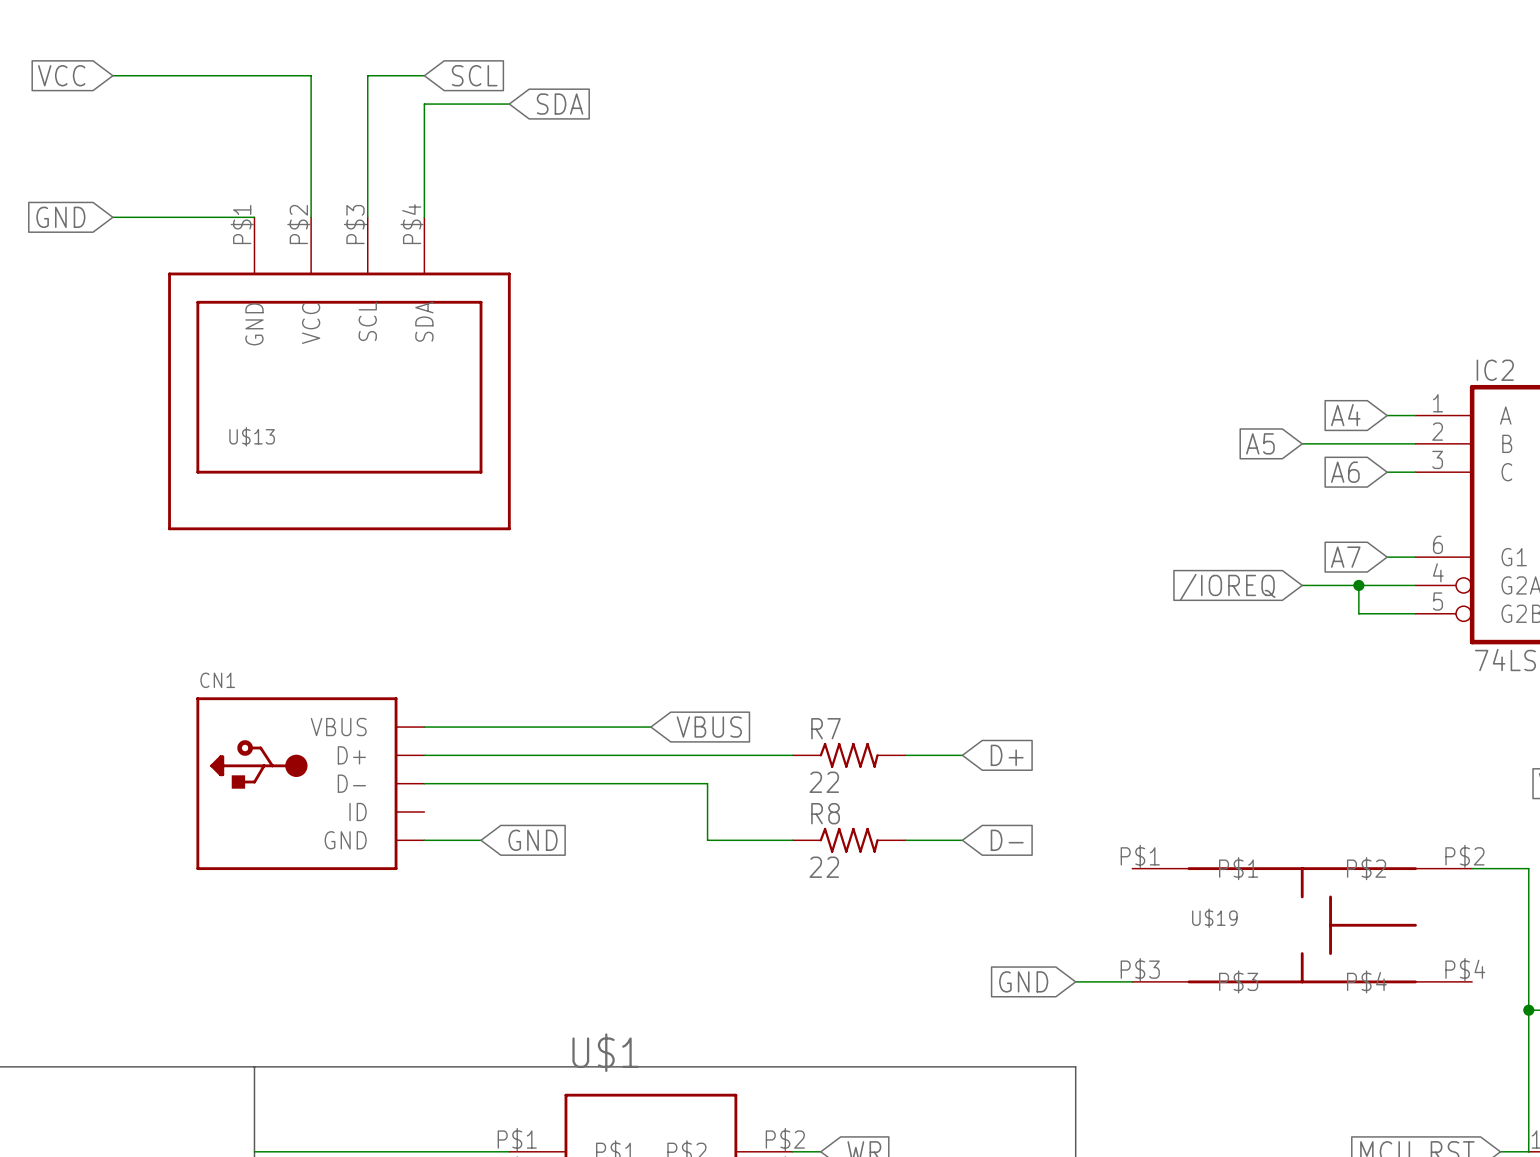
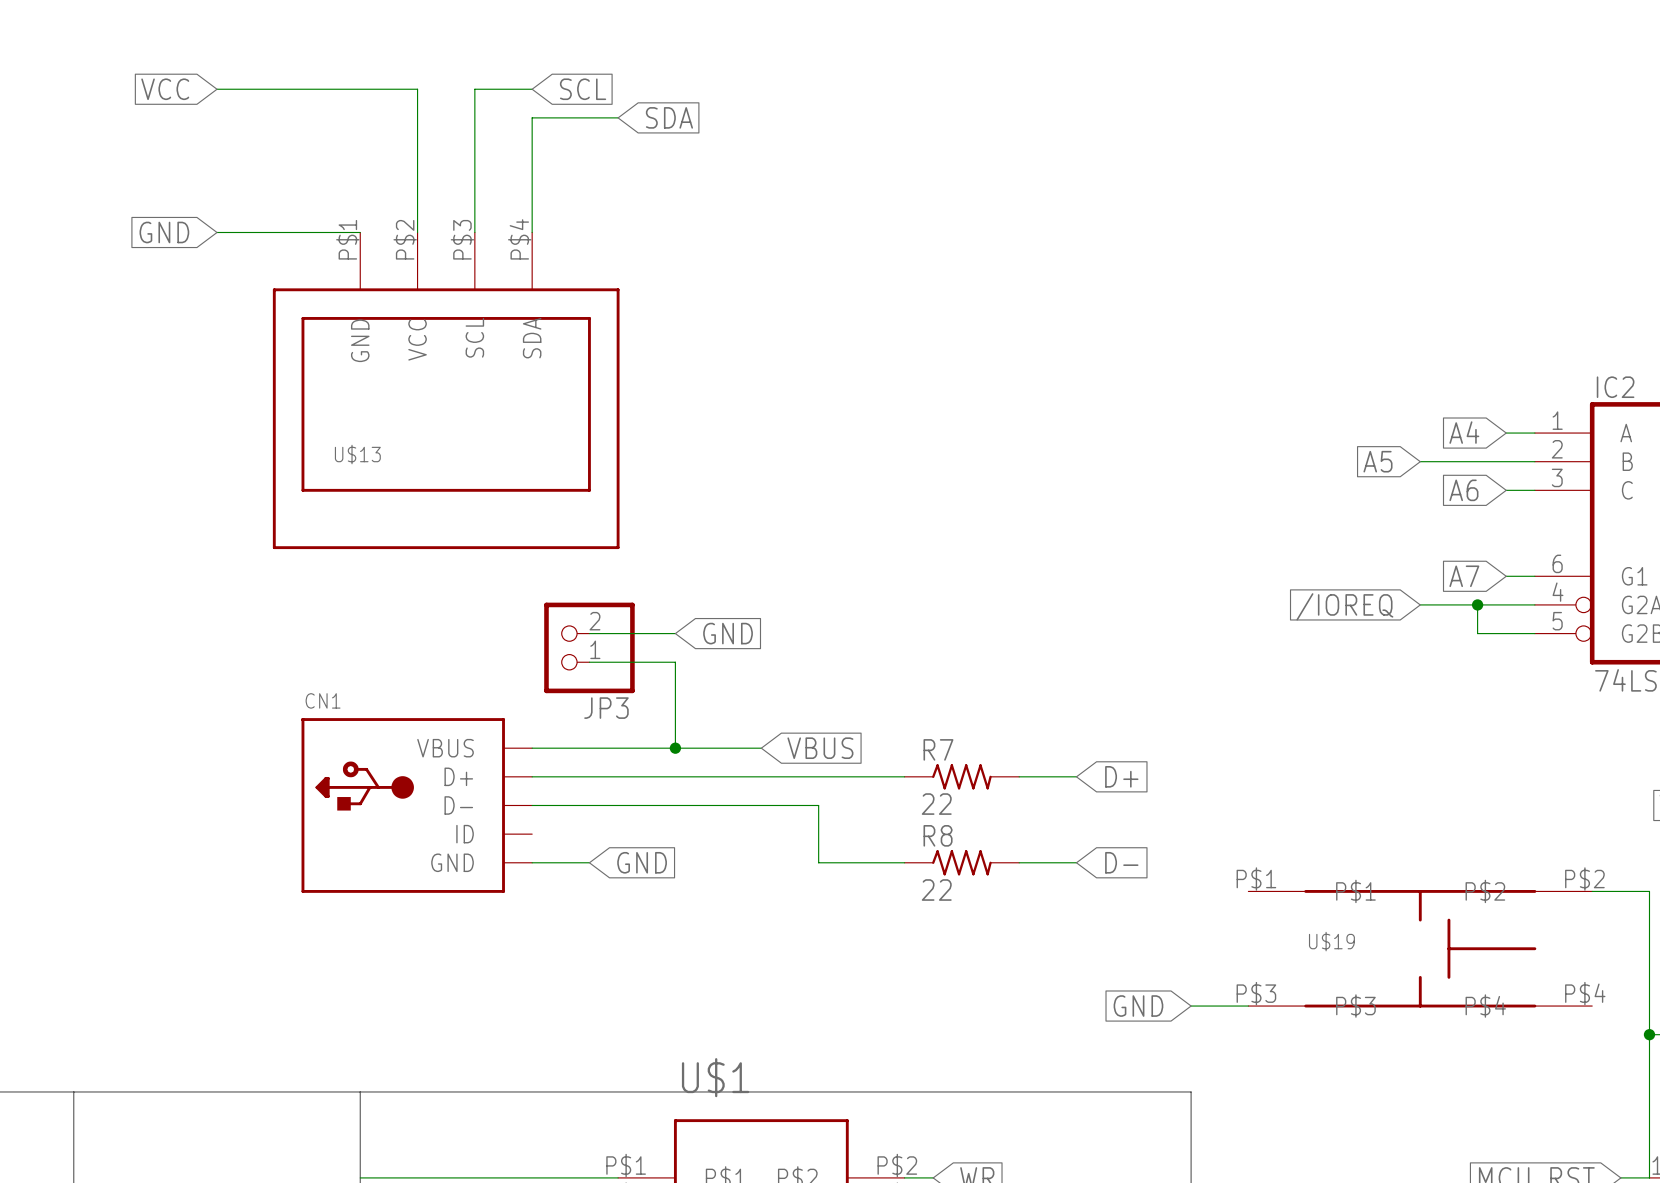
wire: none -> (589, 633) (675, 633)
global label: none -> GND (728, 633)
JP3: none -> (589, 647)
wire: none -> (589, 662) (675, 662) (675, 748)
junction: none -> (675, 748)

